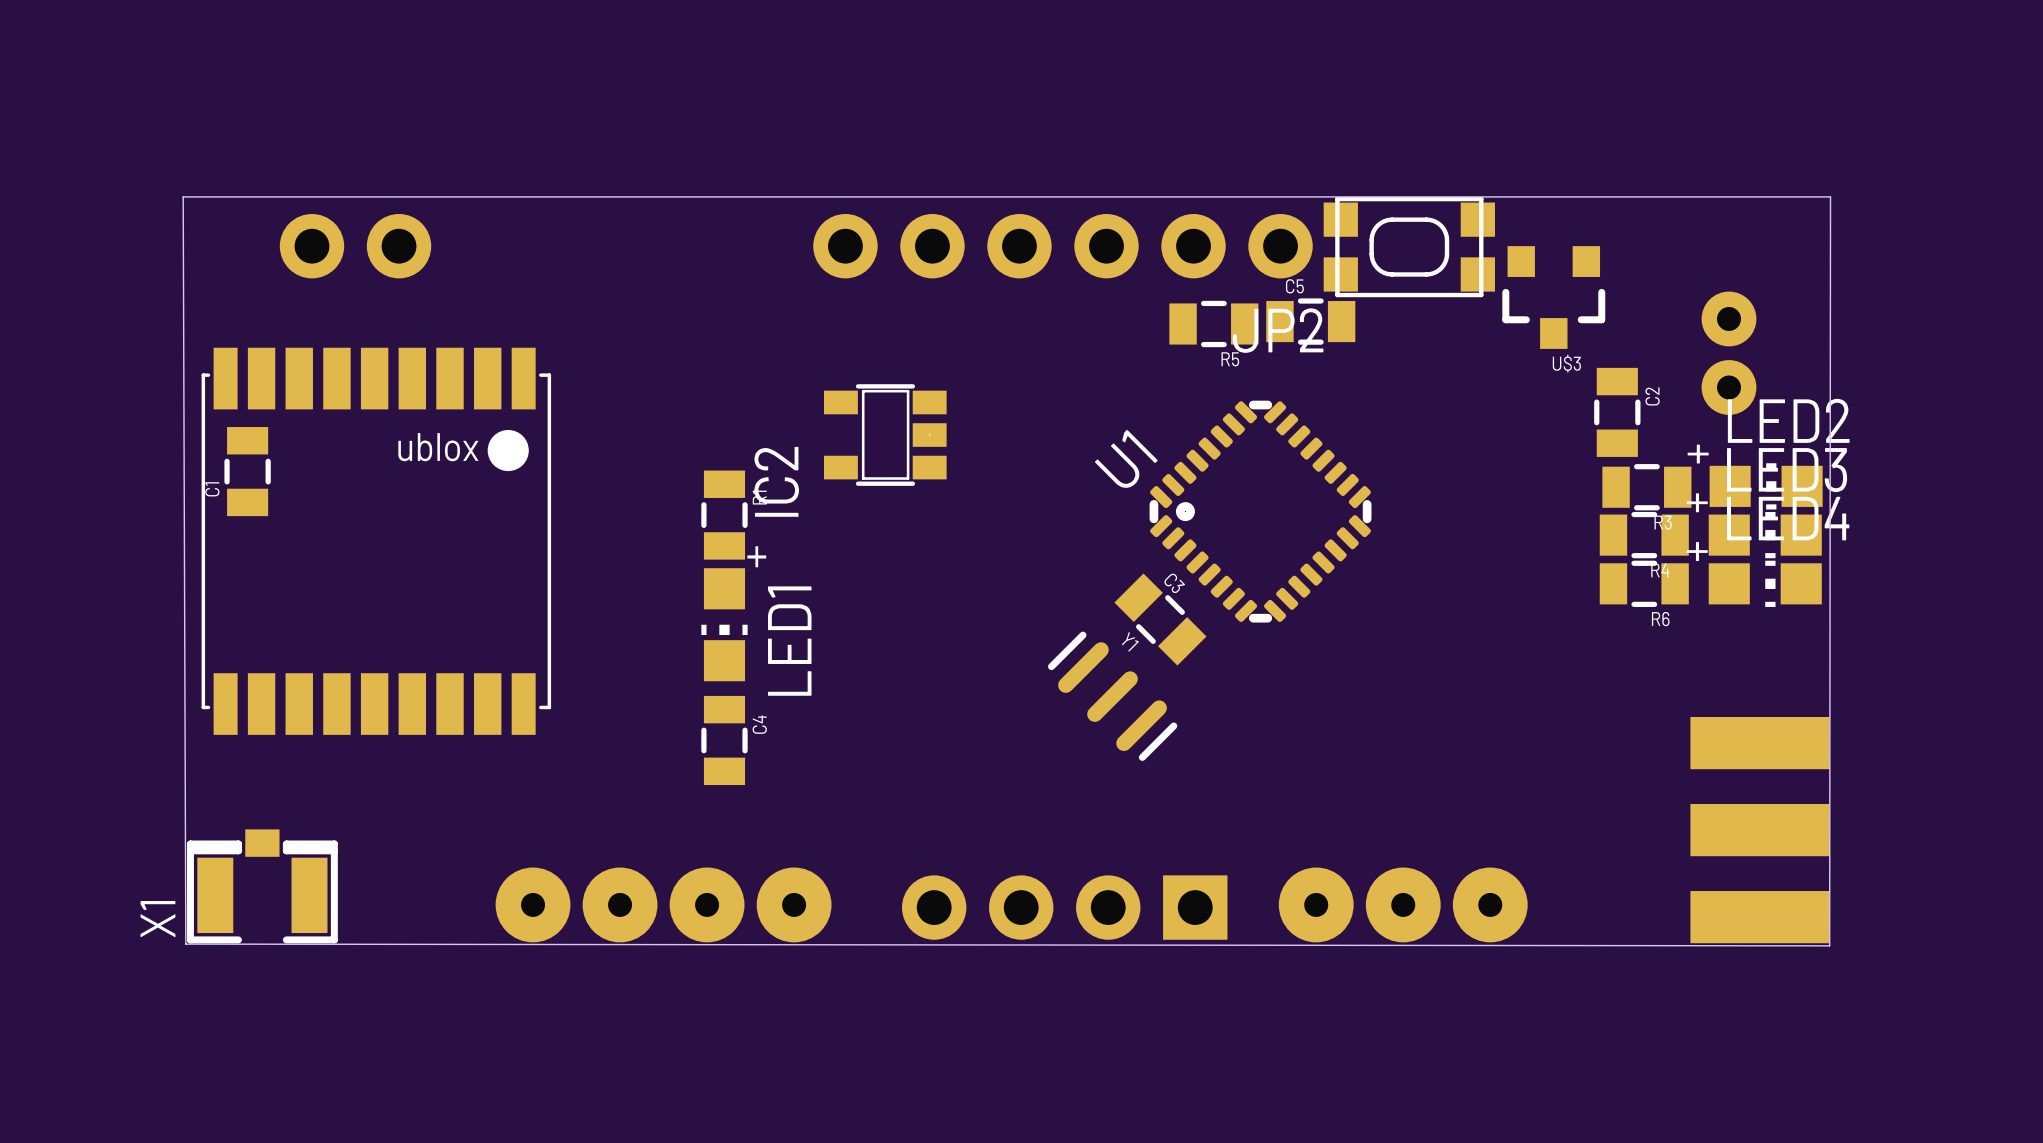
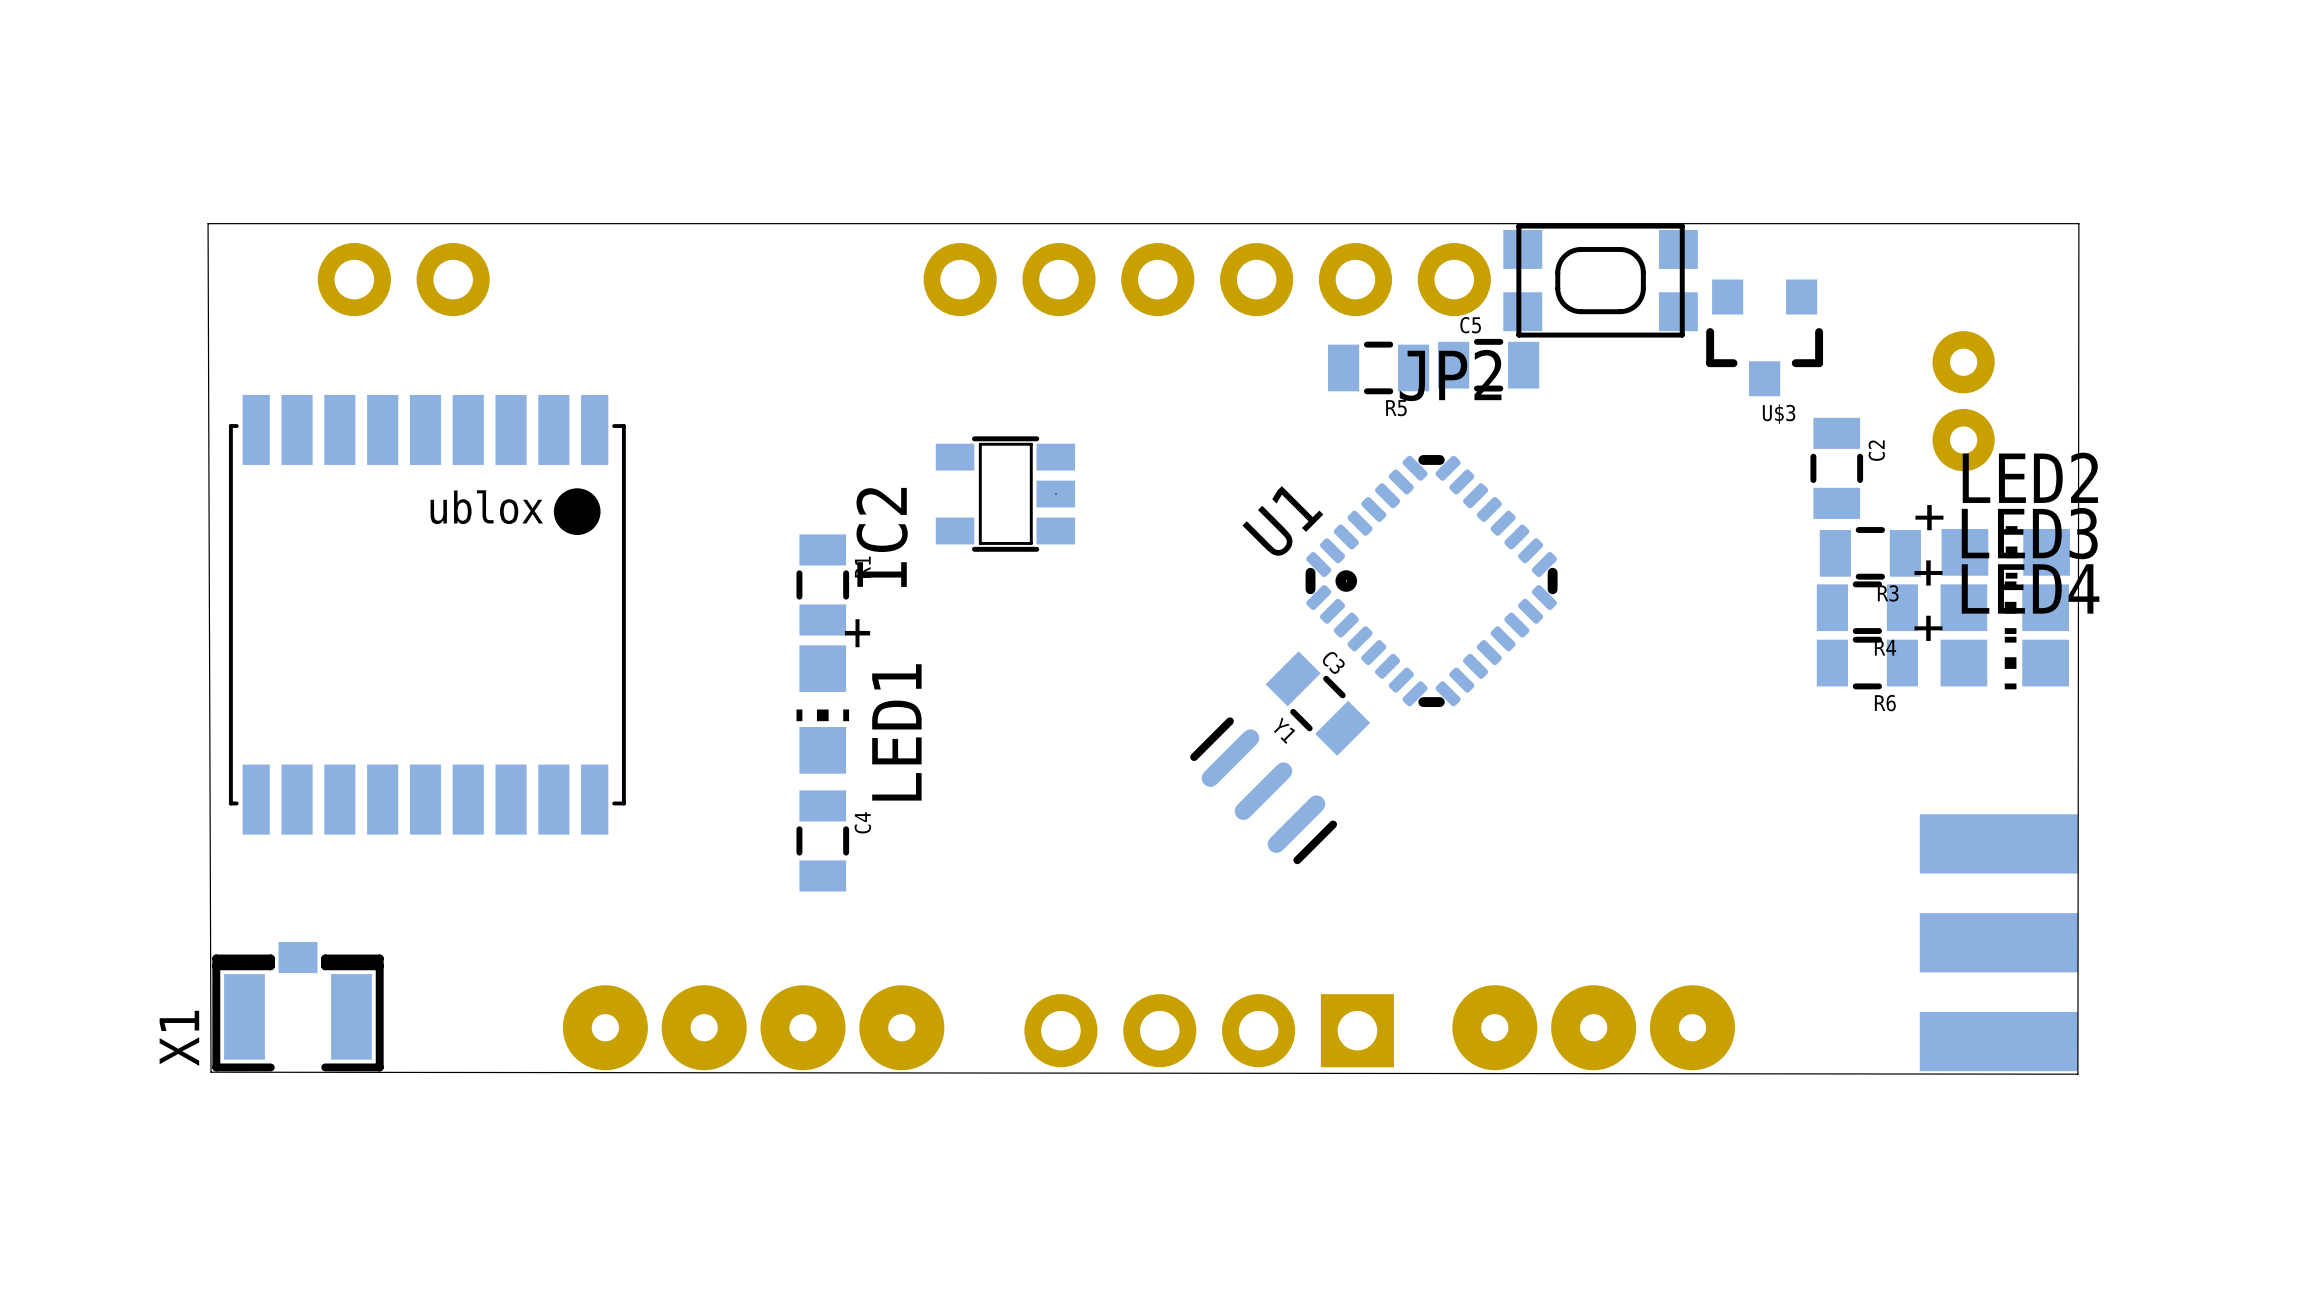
C1: (247, 471) -> none

